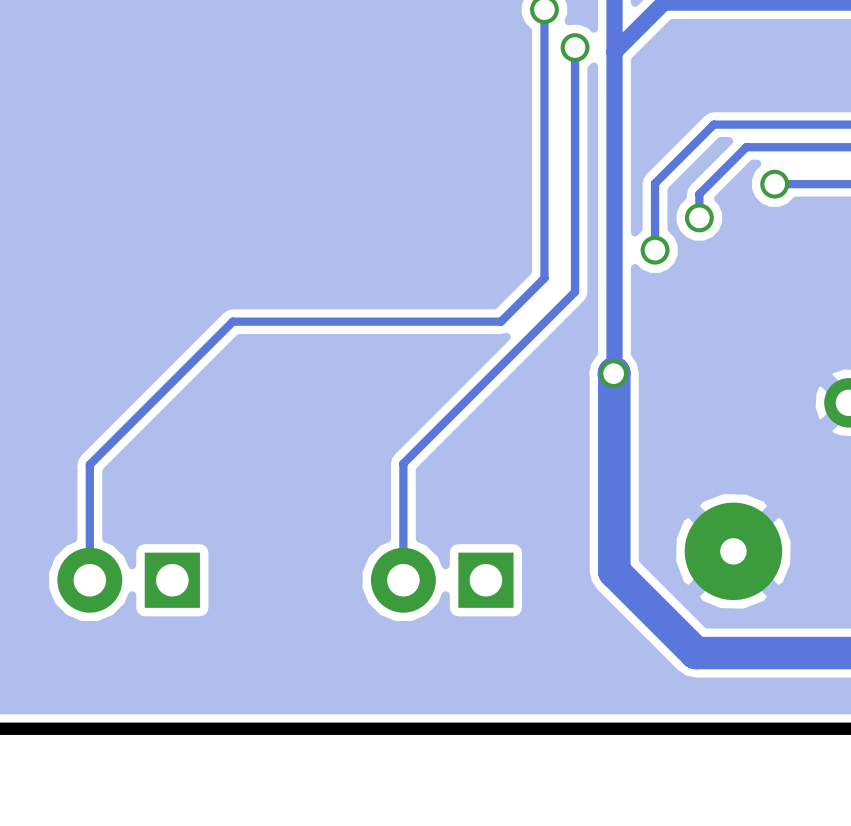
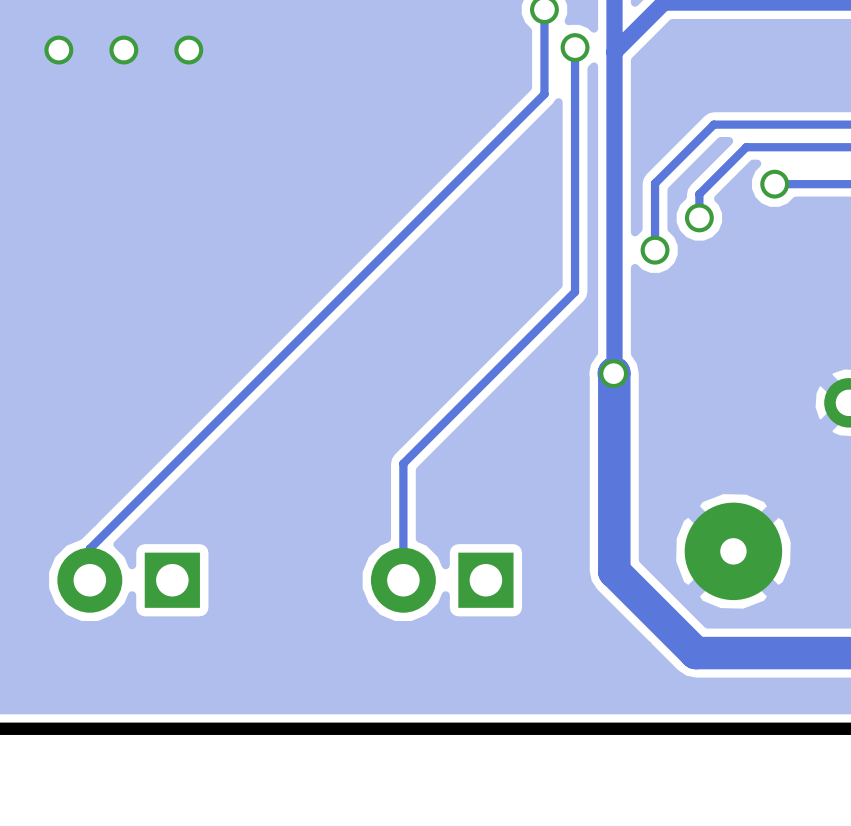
via: none -> (58, 50)
via: none -> (123, 50)
via: none -> (188, 50)
track: (544, 94) (544, 278) (501, 321) (232, 321) (89, 464) (89, 548) -> (544, 94) (89, 548)

